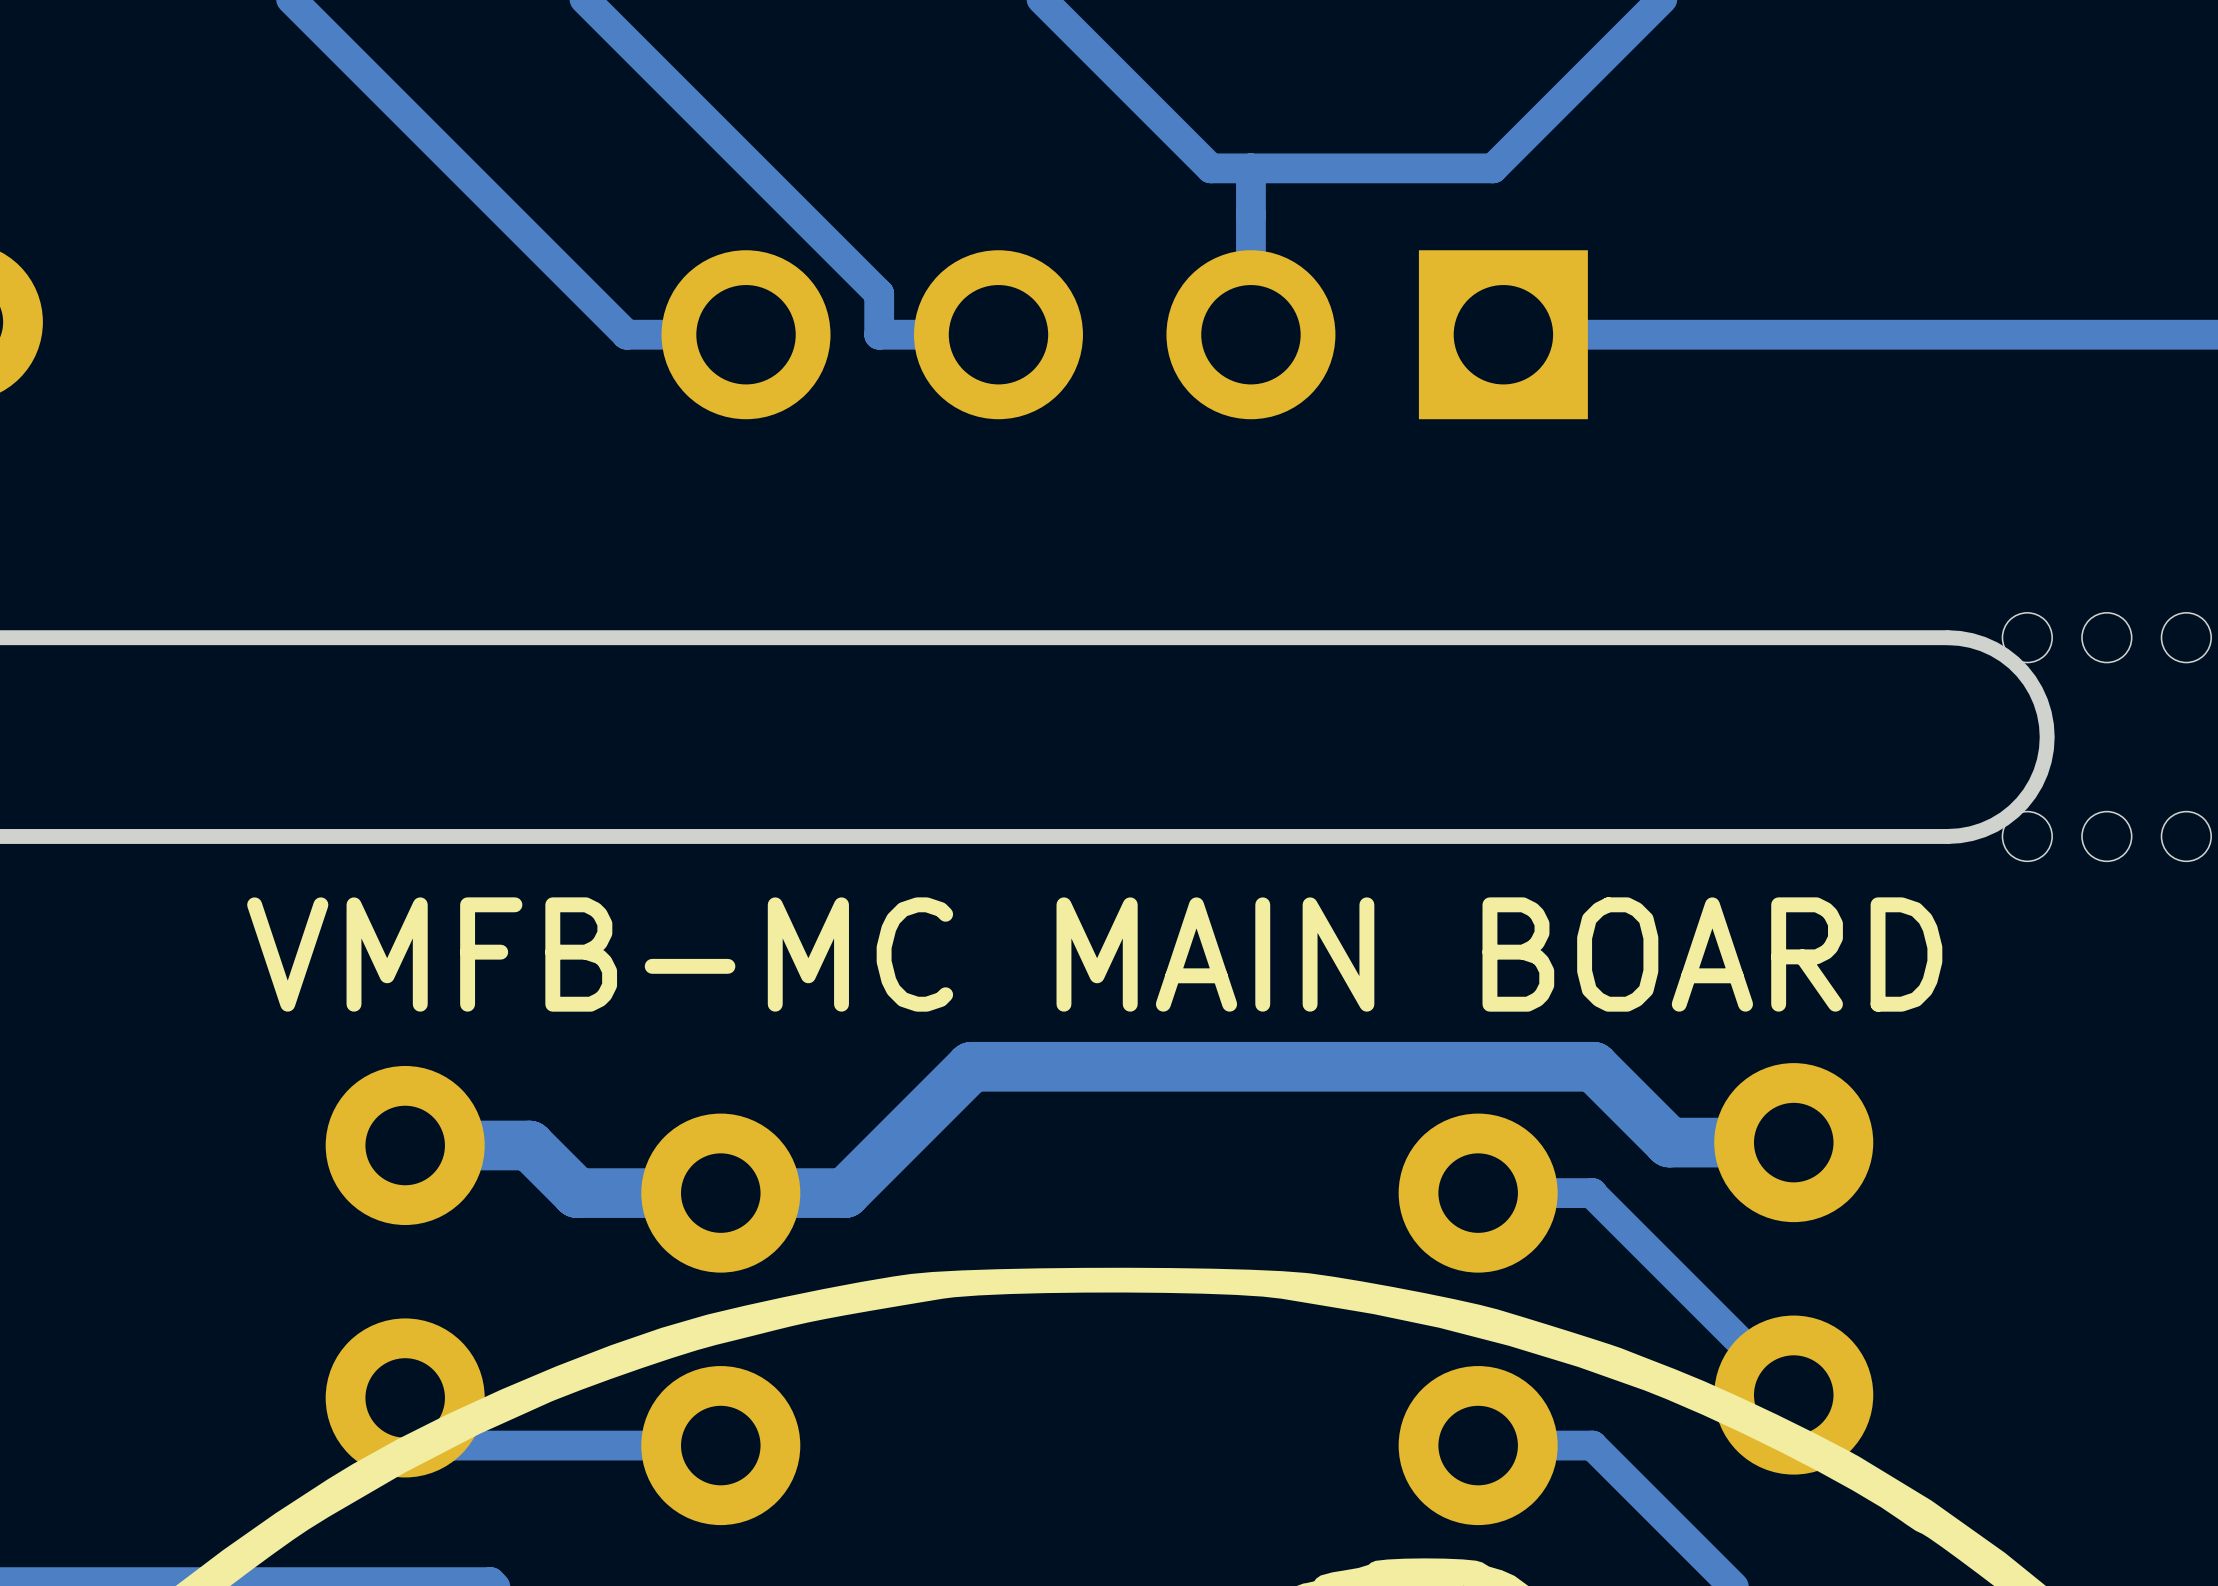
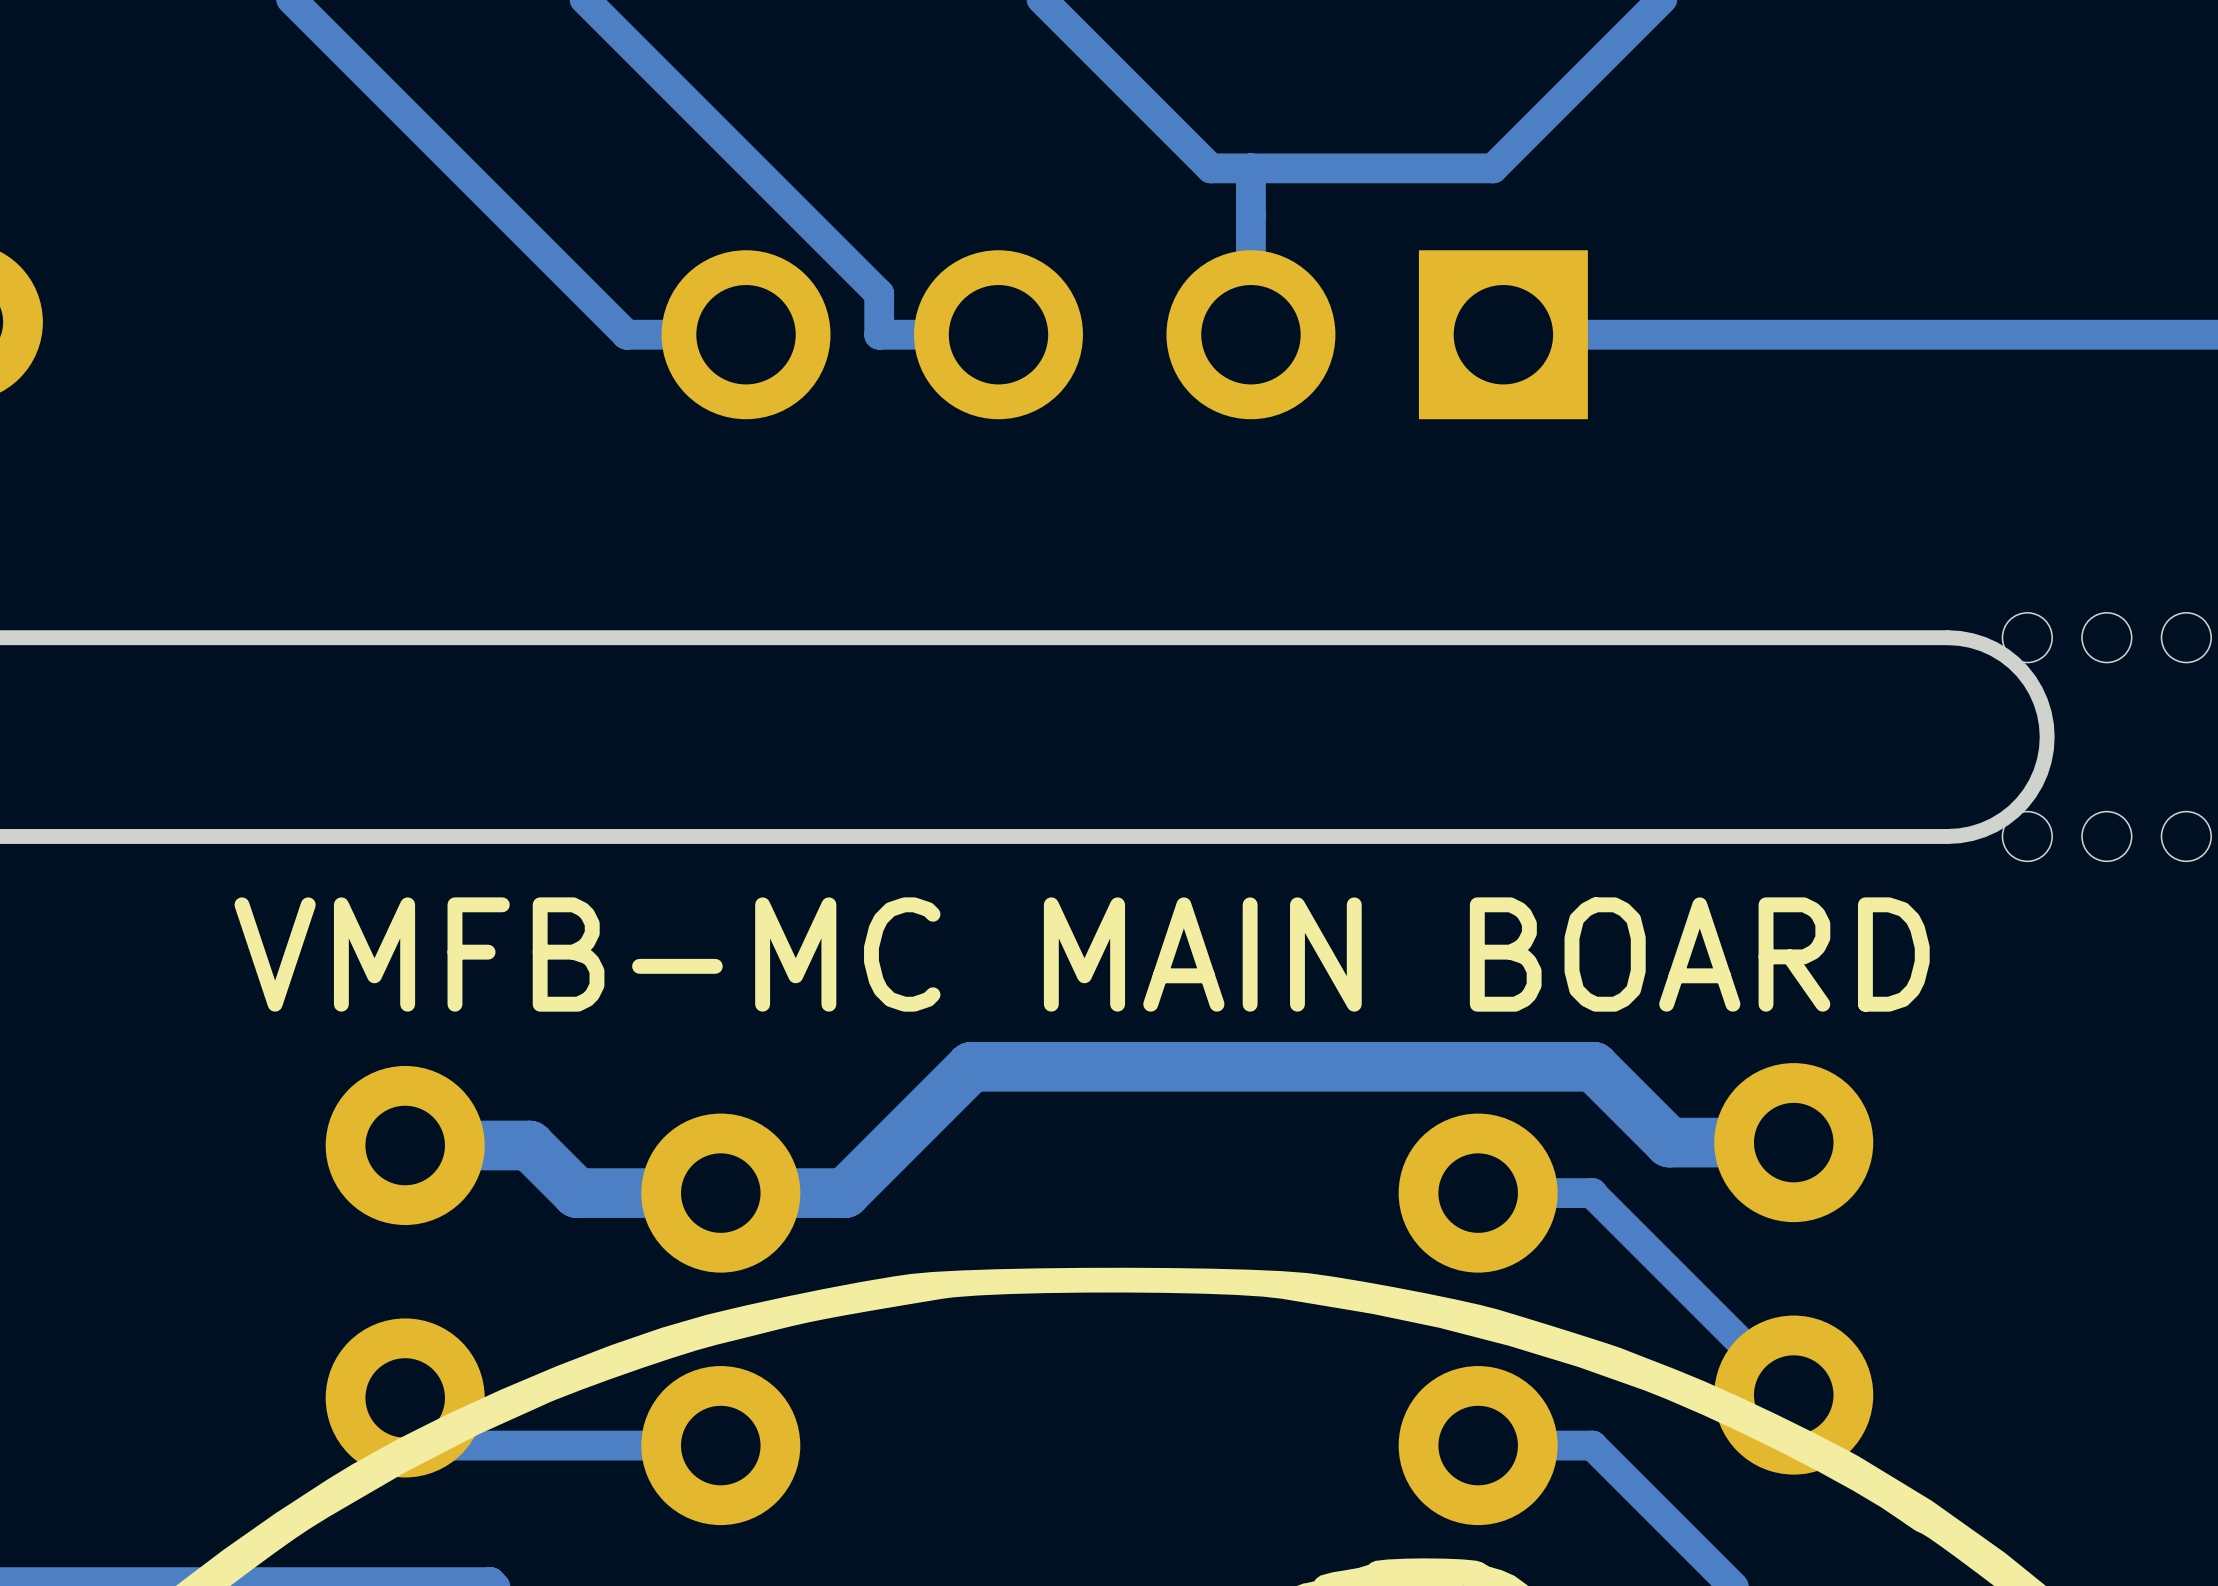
text position: VMFB-MC MAIN BOARD (1094, 954) -> VMFB-MC MAIN BOARD (1082, 954)

